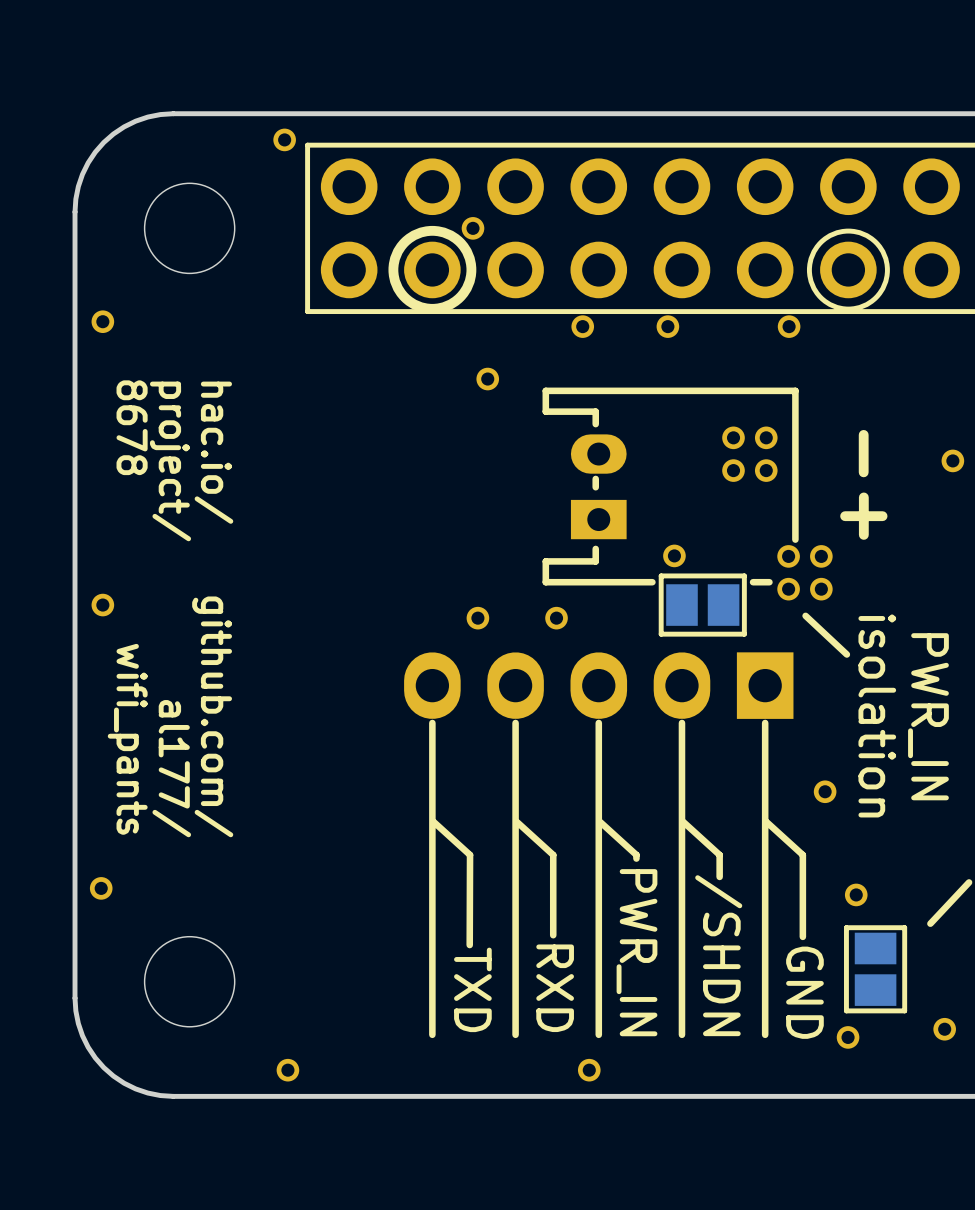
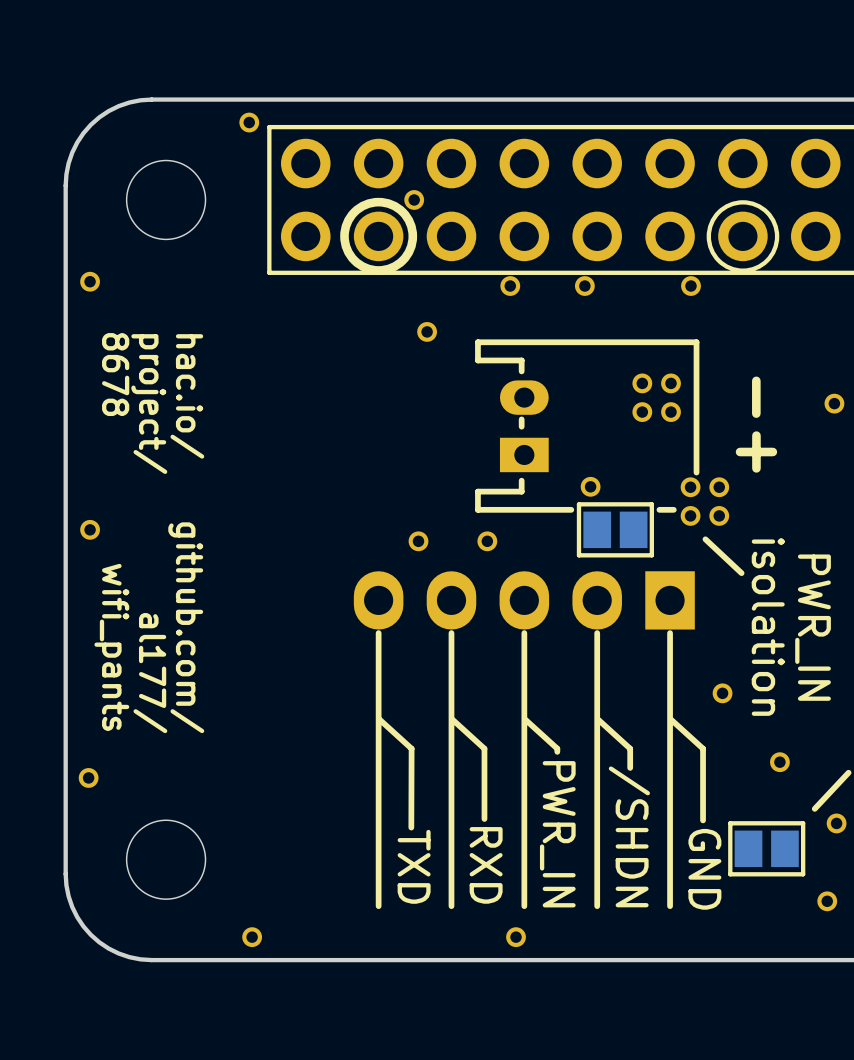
part position: (856, 894) -> (779, 762)
part: none -> (836, 823)
part rotation: 0° (875, 969) -> 90° clockwise (766, 848)
part: (848, 1037) -> none

